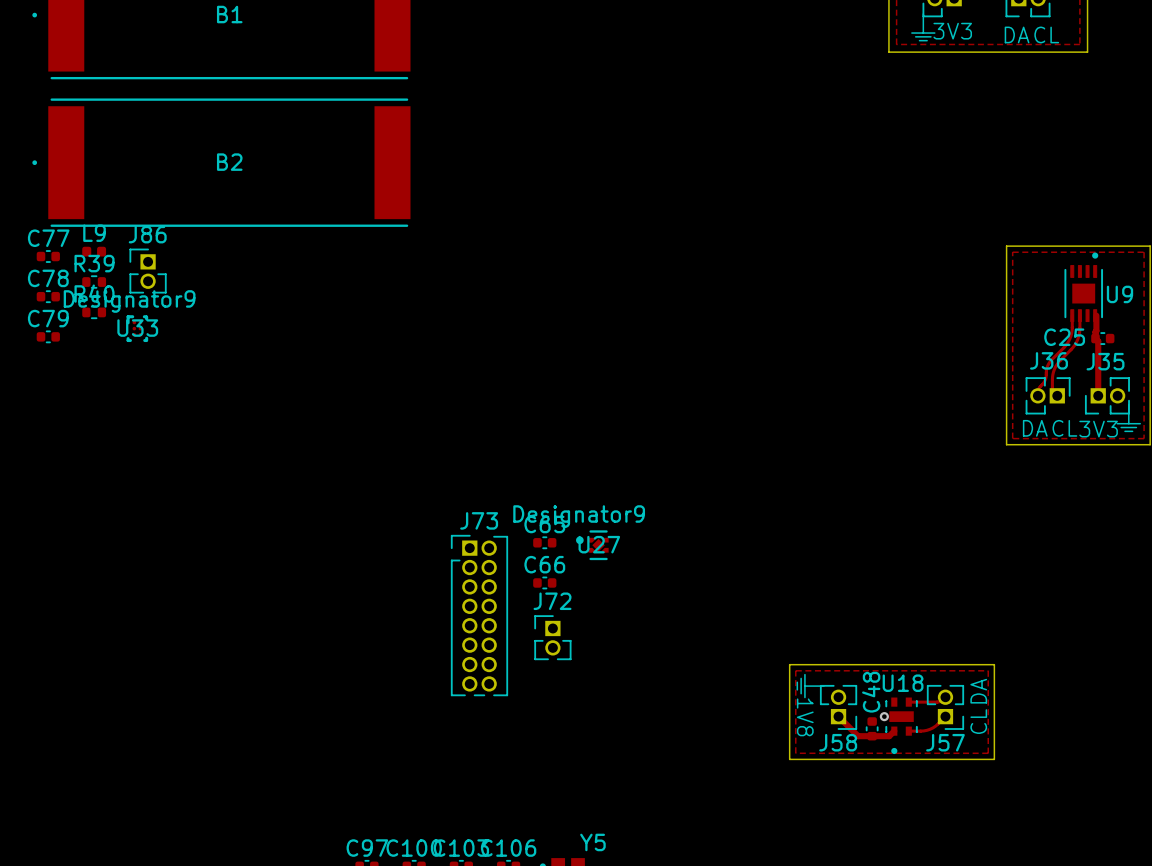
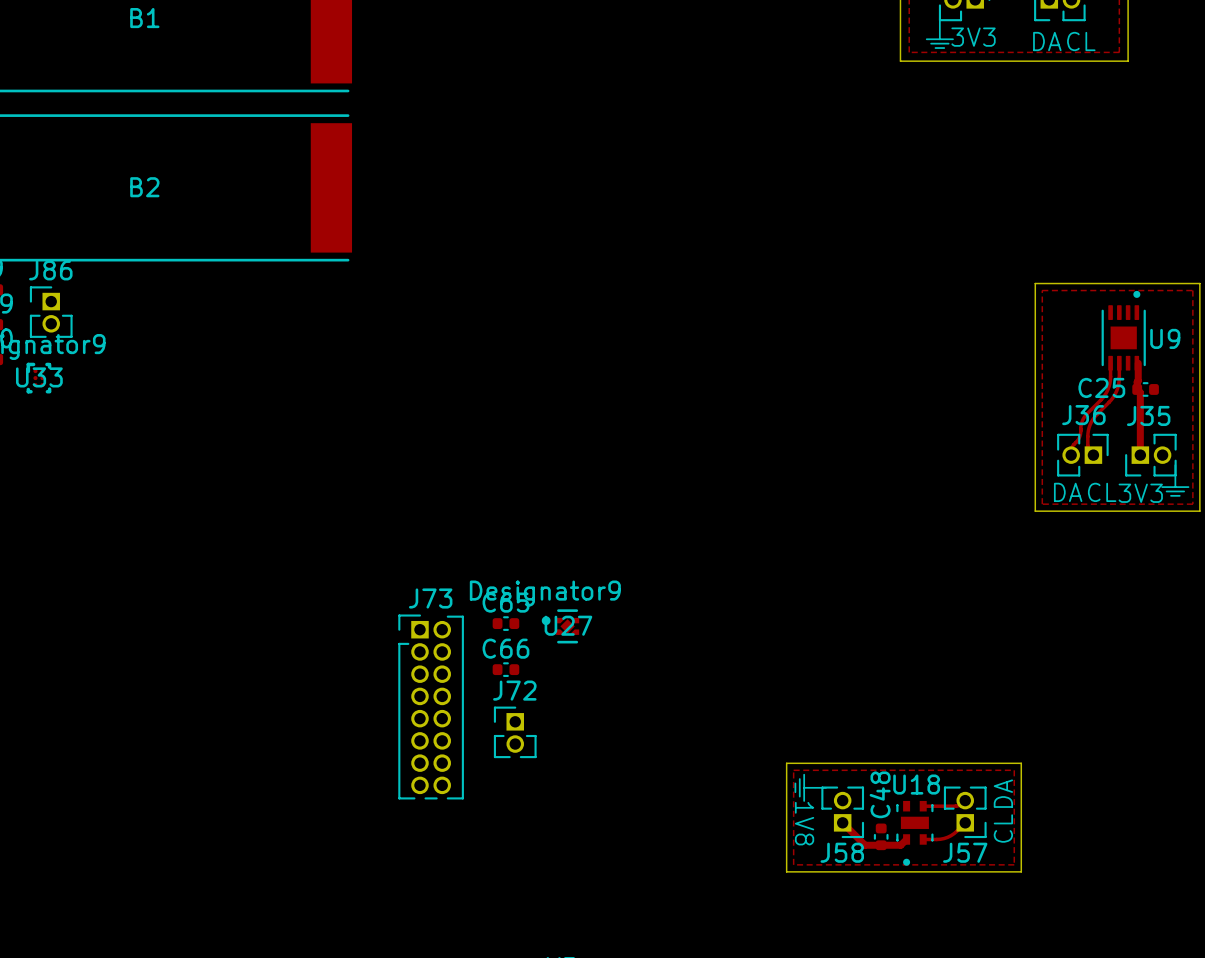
via: (884, 716) -> none

